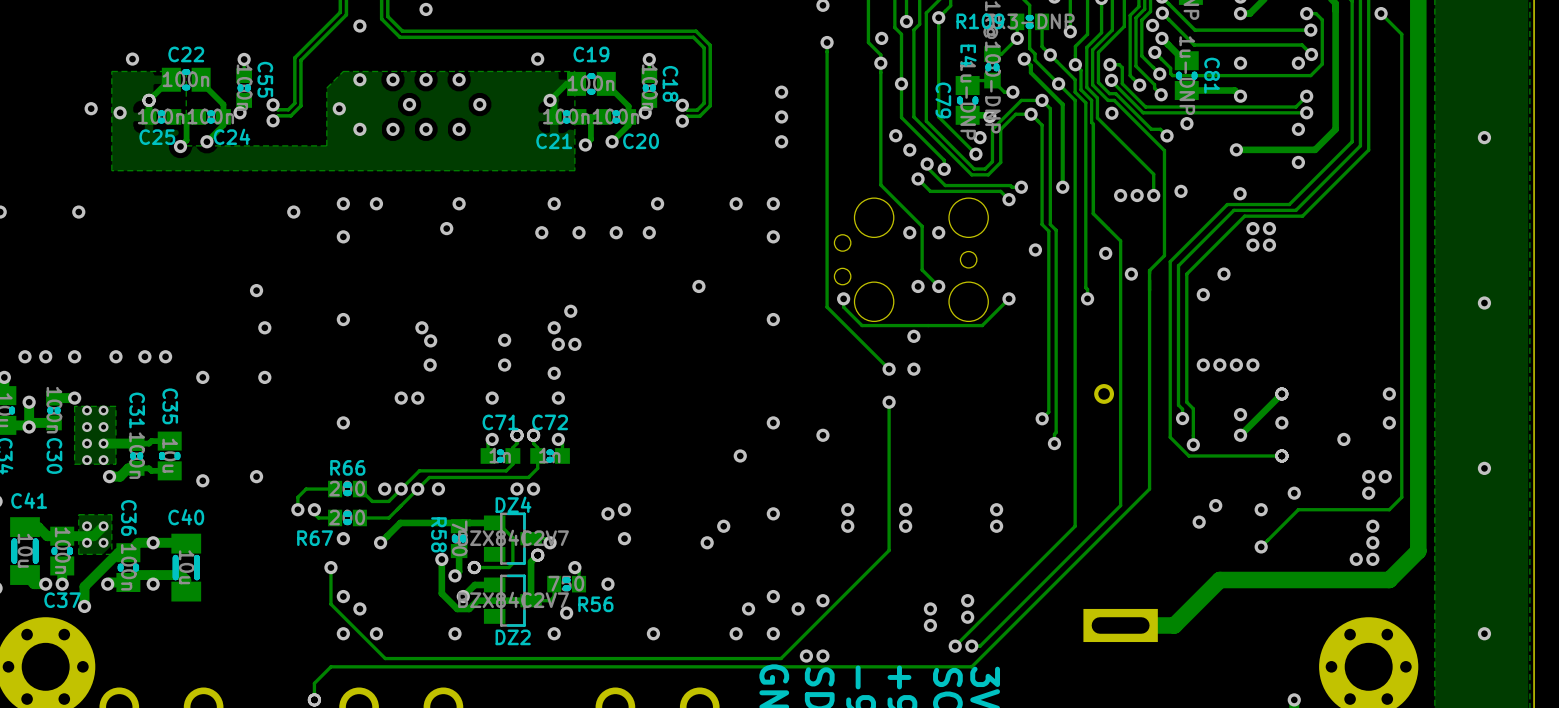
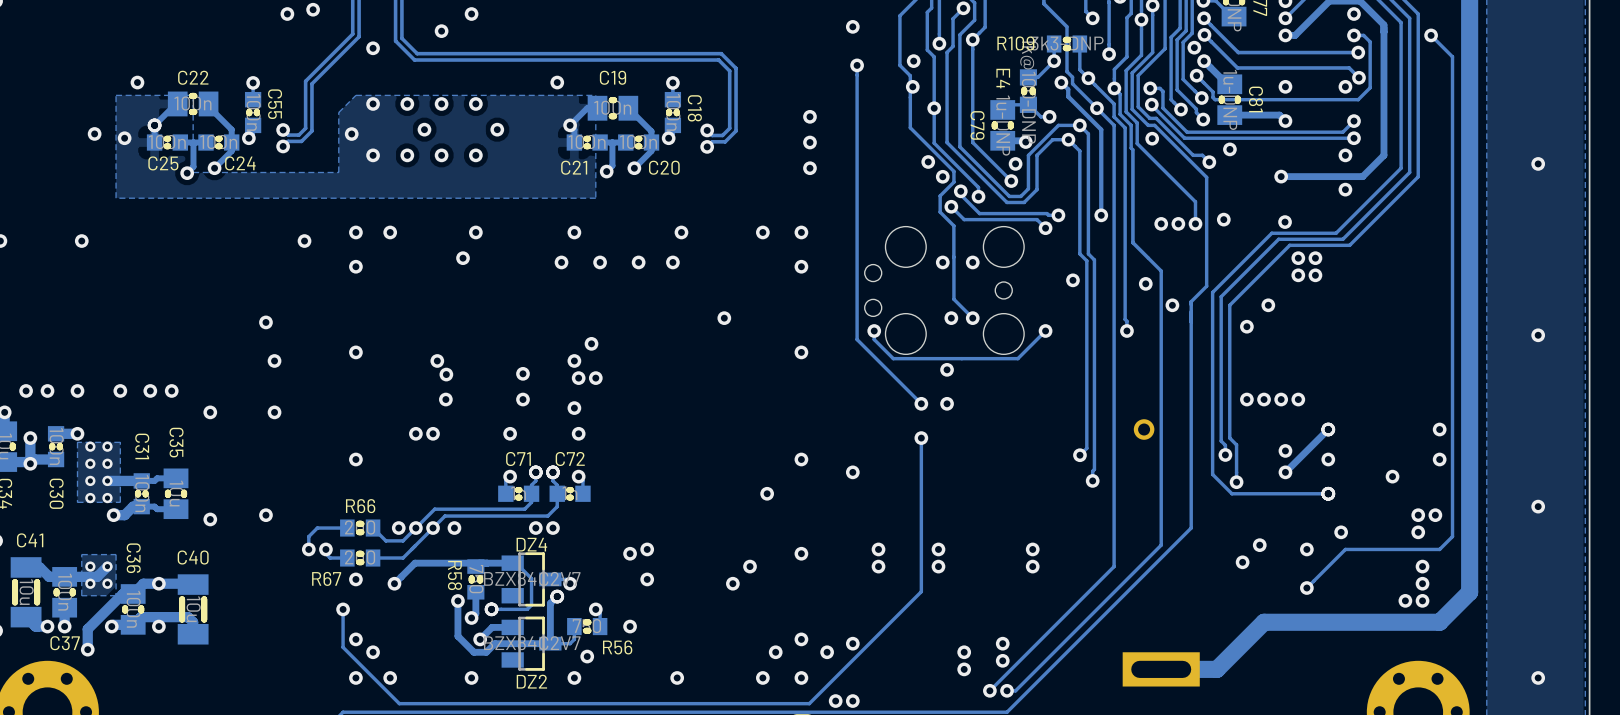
track: (878, 52) (880, 54) (880, 185) (922, 226) (922, 269) -> (910, 75) (910, 127) (953, 171) (953, 182) (940, 195) (940, 212) (953, 225) (953, 299) (955, 300)

